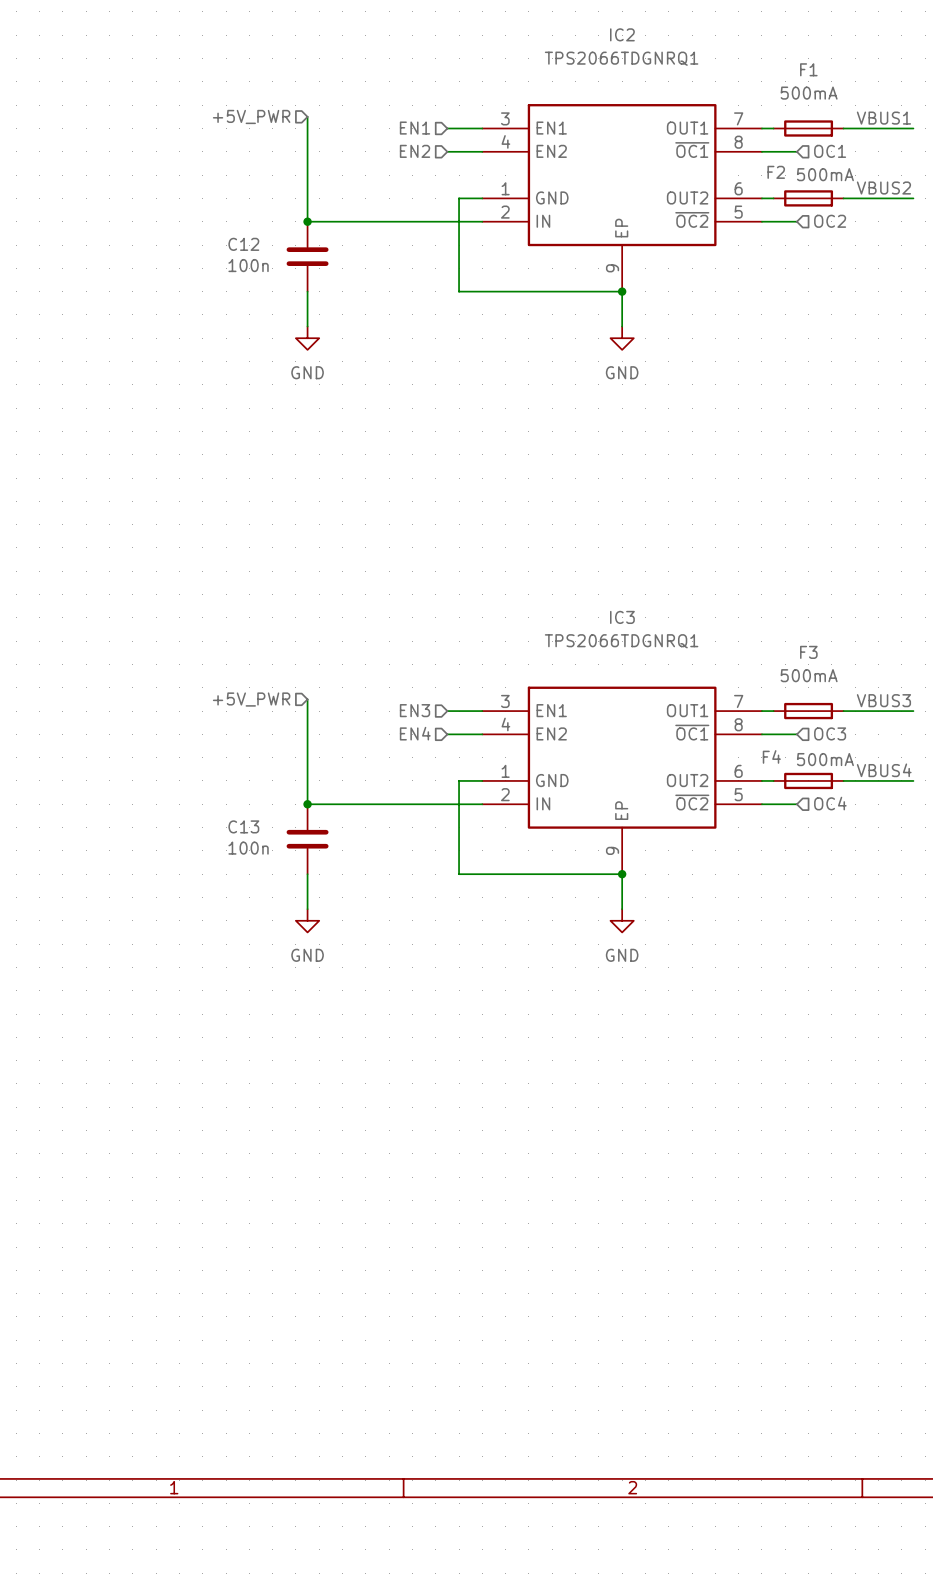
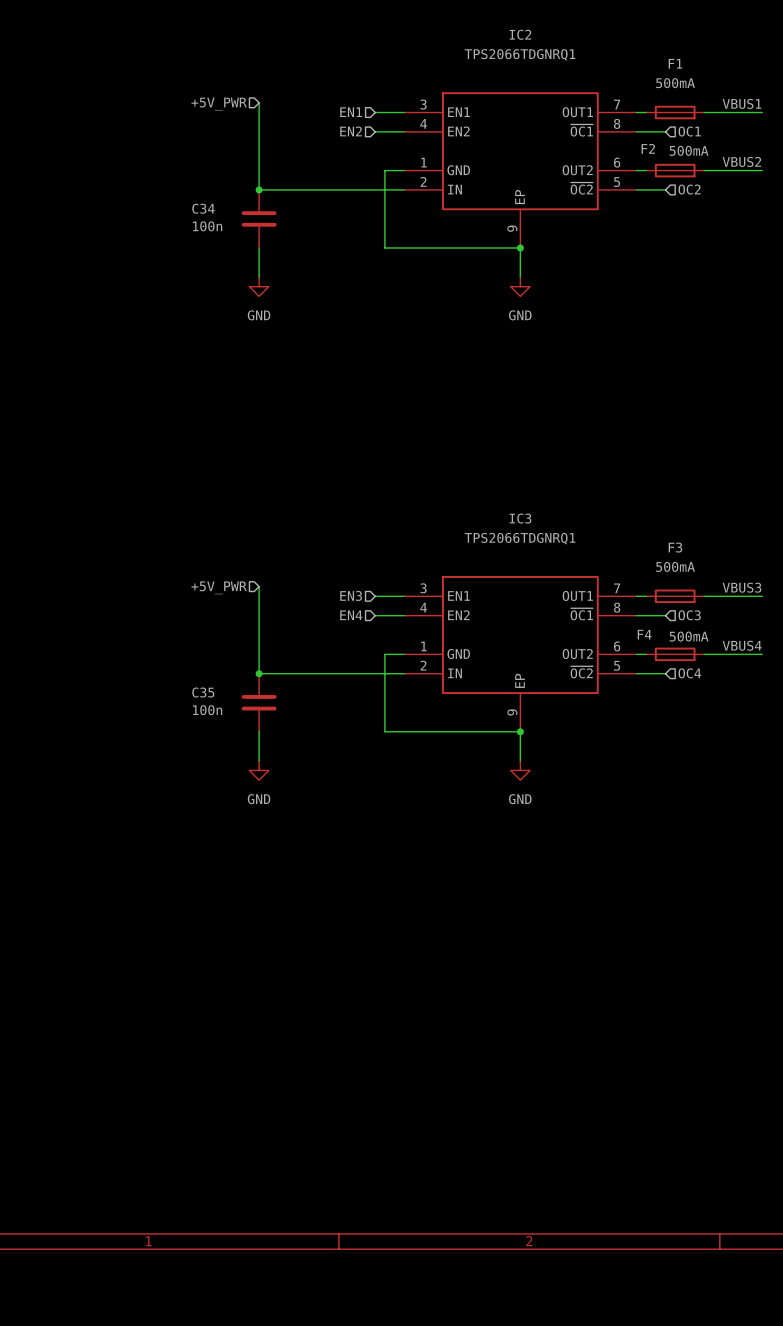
C12 name: C12 (243, 244) -> C34 (203, 208)
C13 name: C13 (243, 826) -> C35 (203, 692)

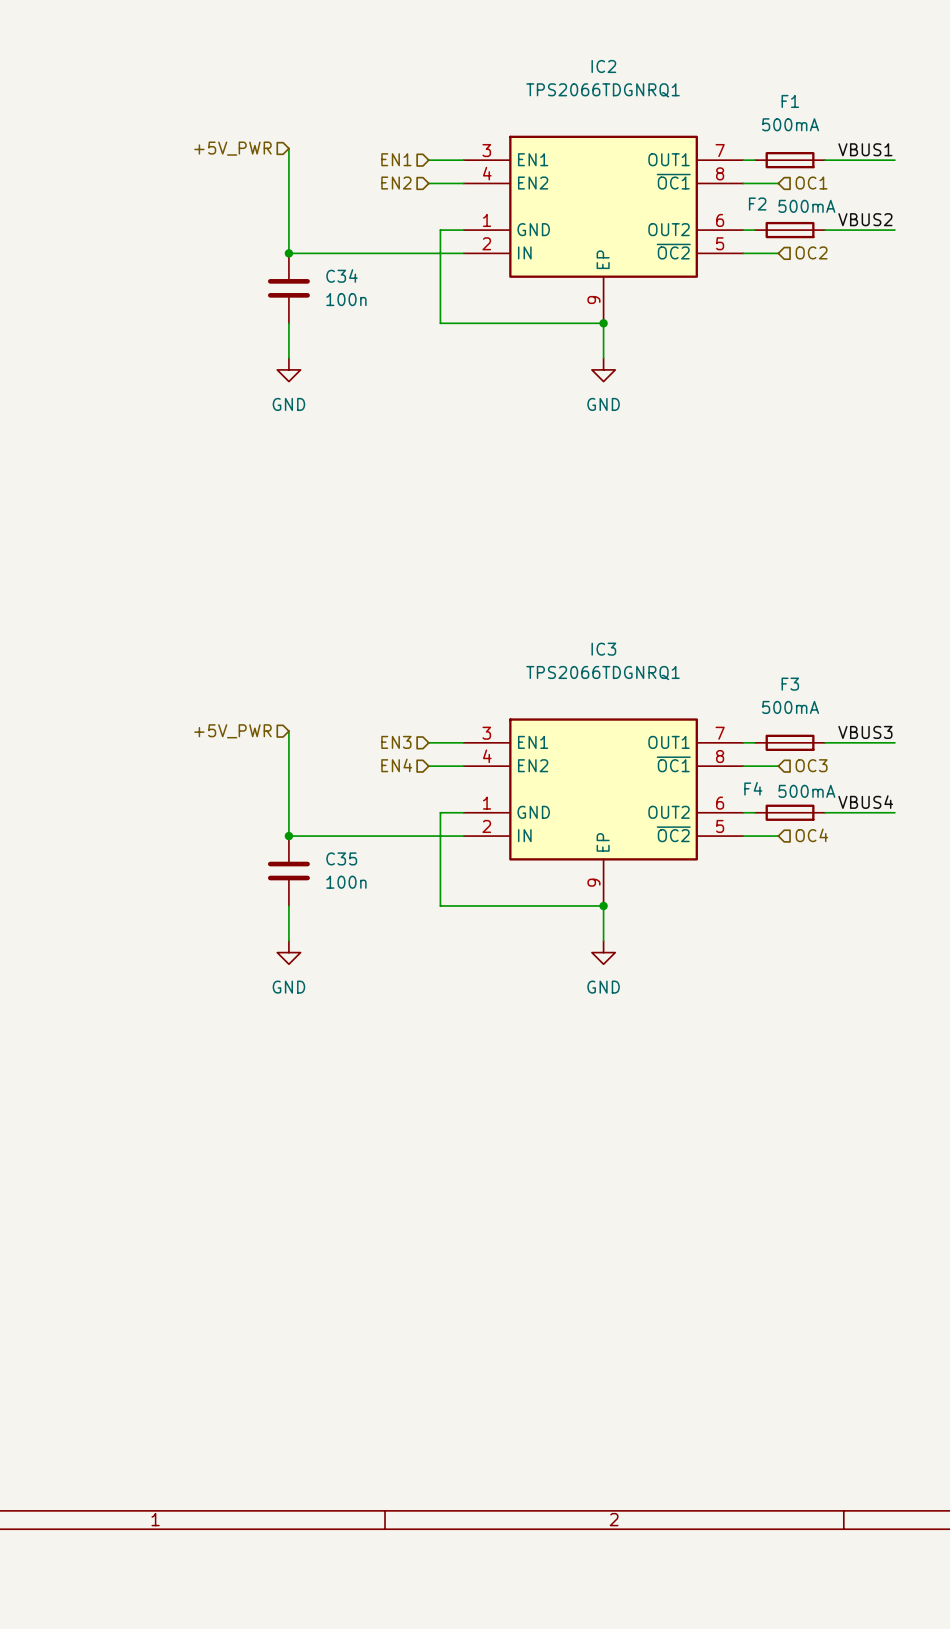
C34 name position: C34 (203, 208) -> C34 (342, 275)
C34 value position: 100n (207, 226) -> 100n (346, 299)
C35 name position: C35 (203, 692) -> C35 (341, 858)
C35 value position: 100n (207, 710) -> 100n (346, 882)

